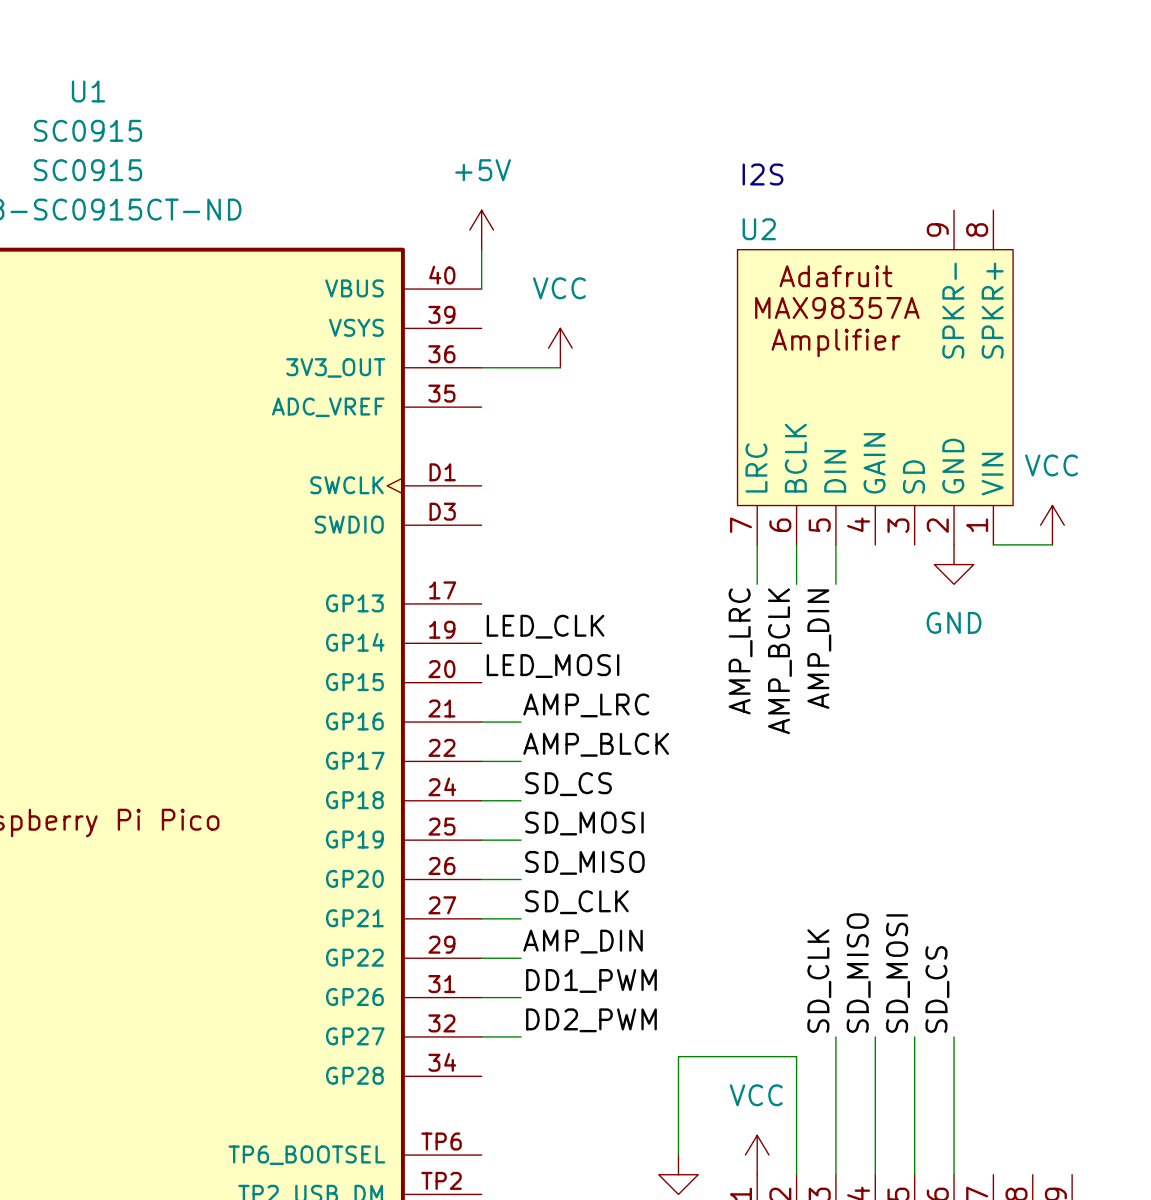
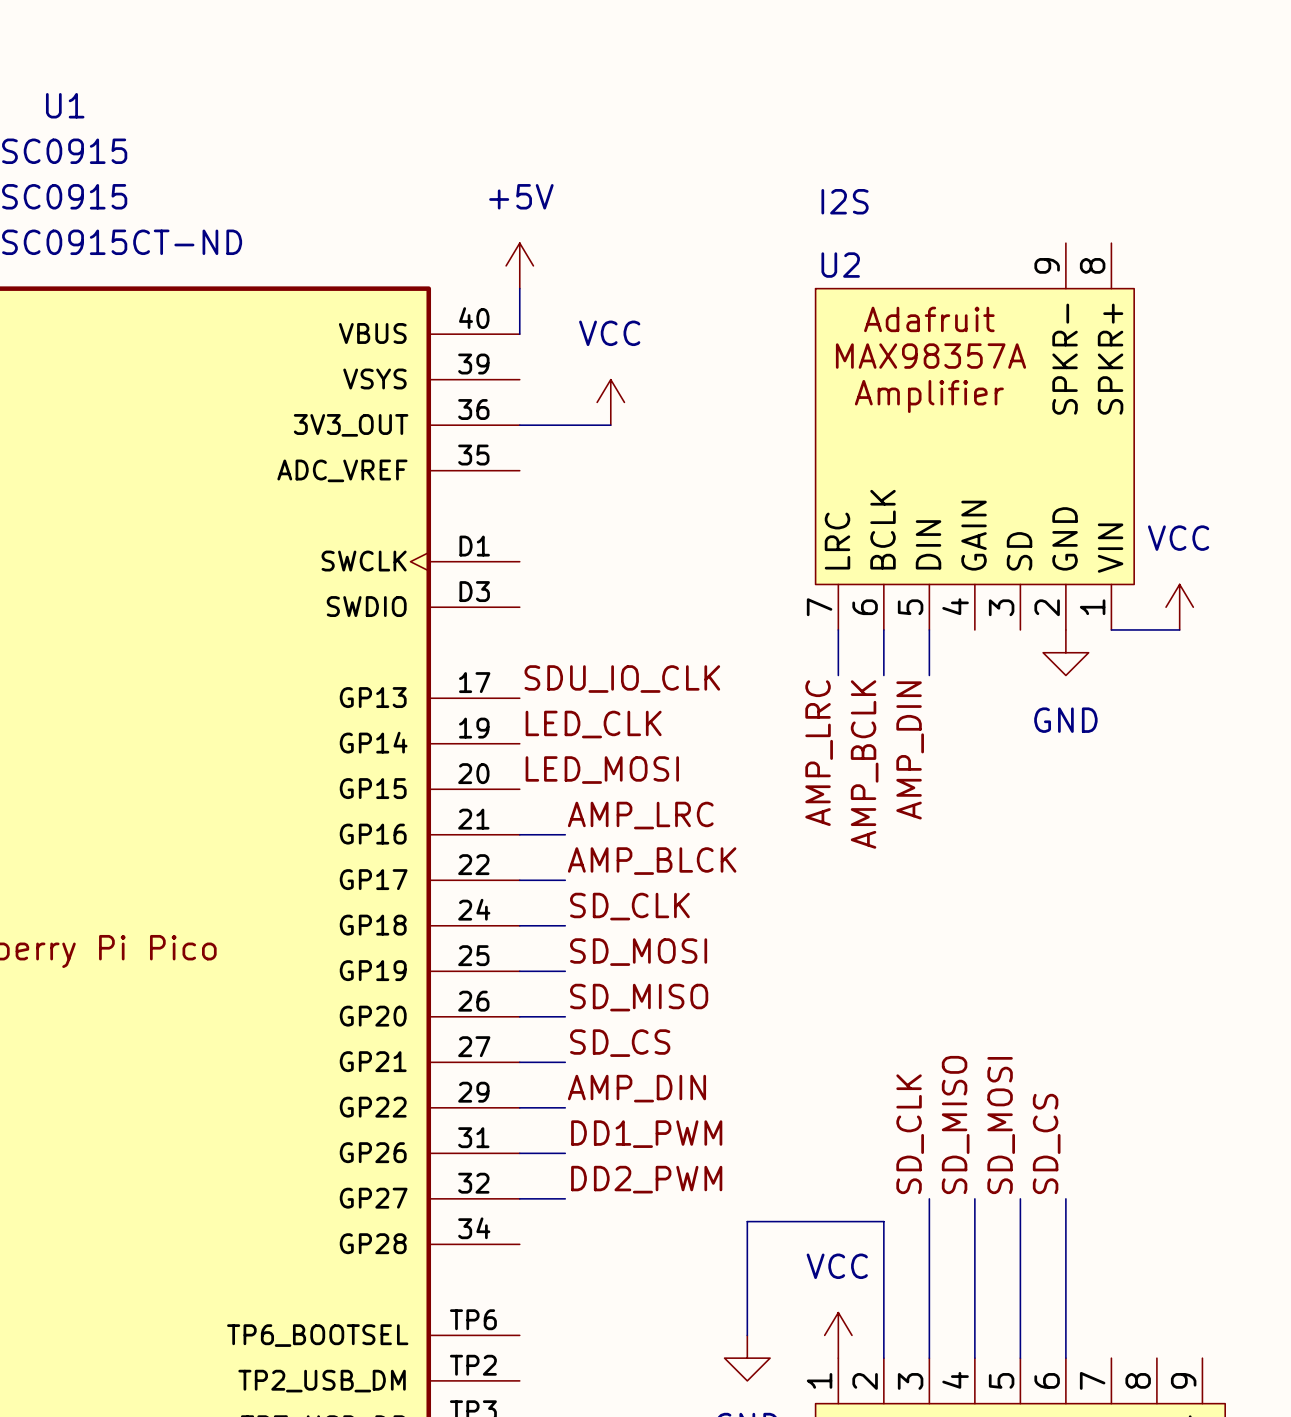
label: none -> SDU_IO_CLK (622, 679)
label: SD_CS (568, 784) -> SD_CLK (629, 906)
label: SD_CLK (576, 902) -> SD_CS (620, 1043)

